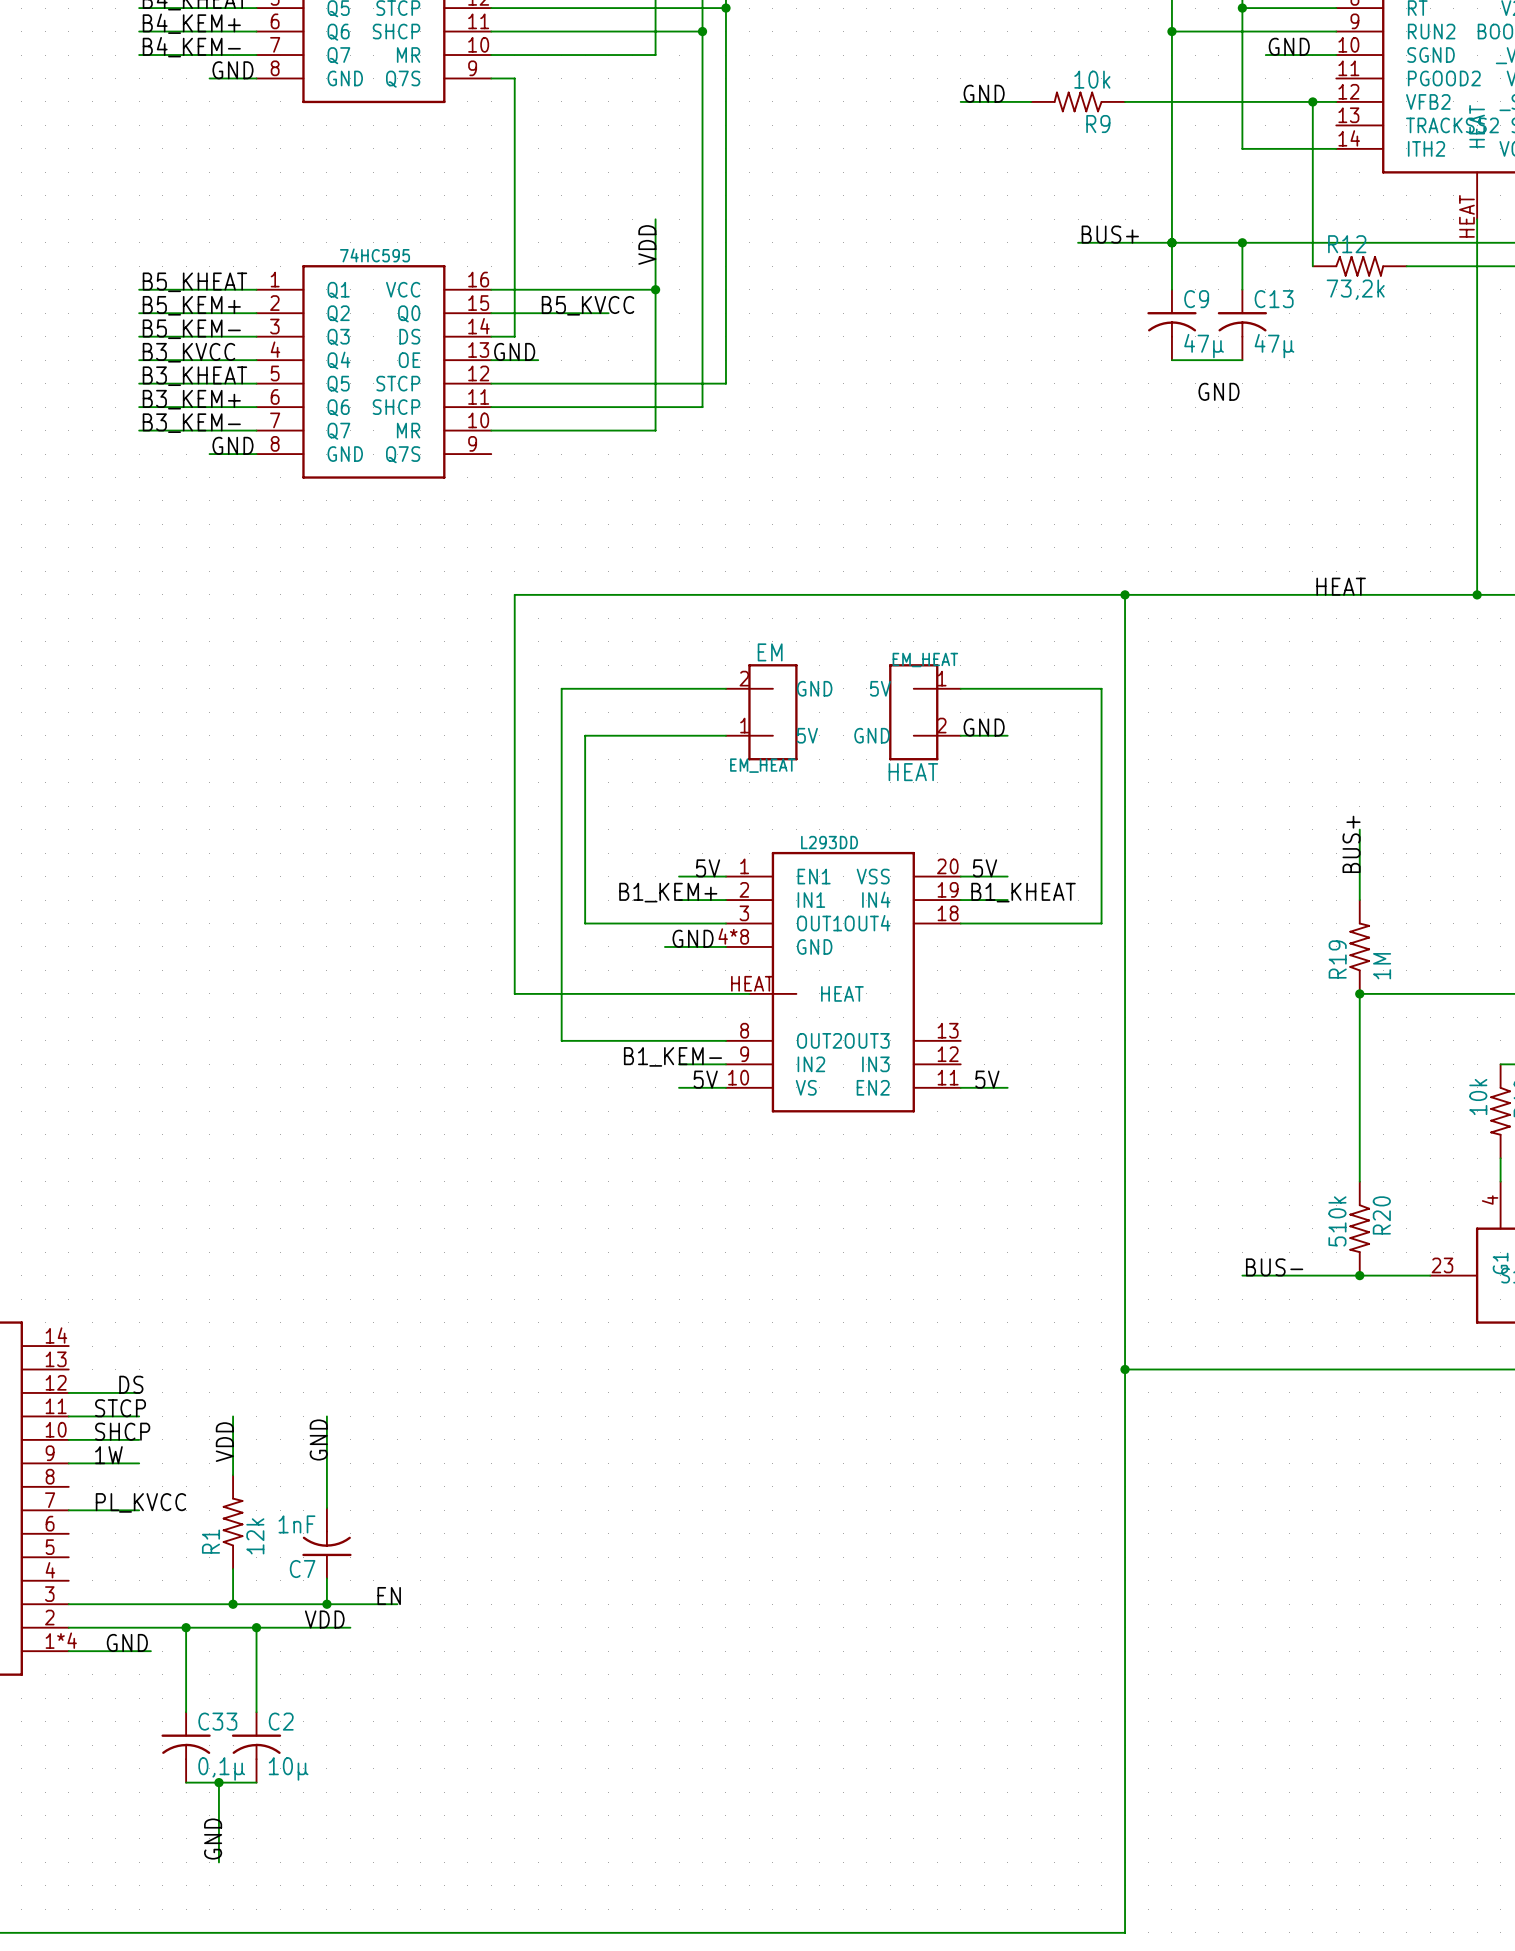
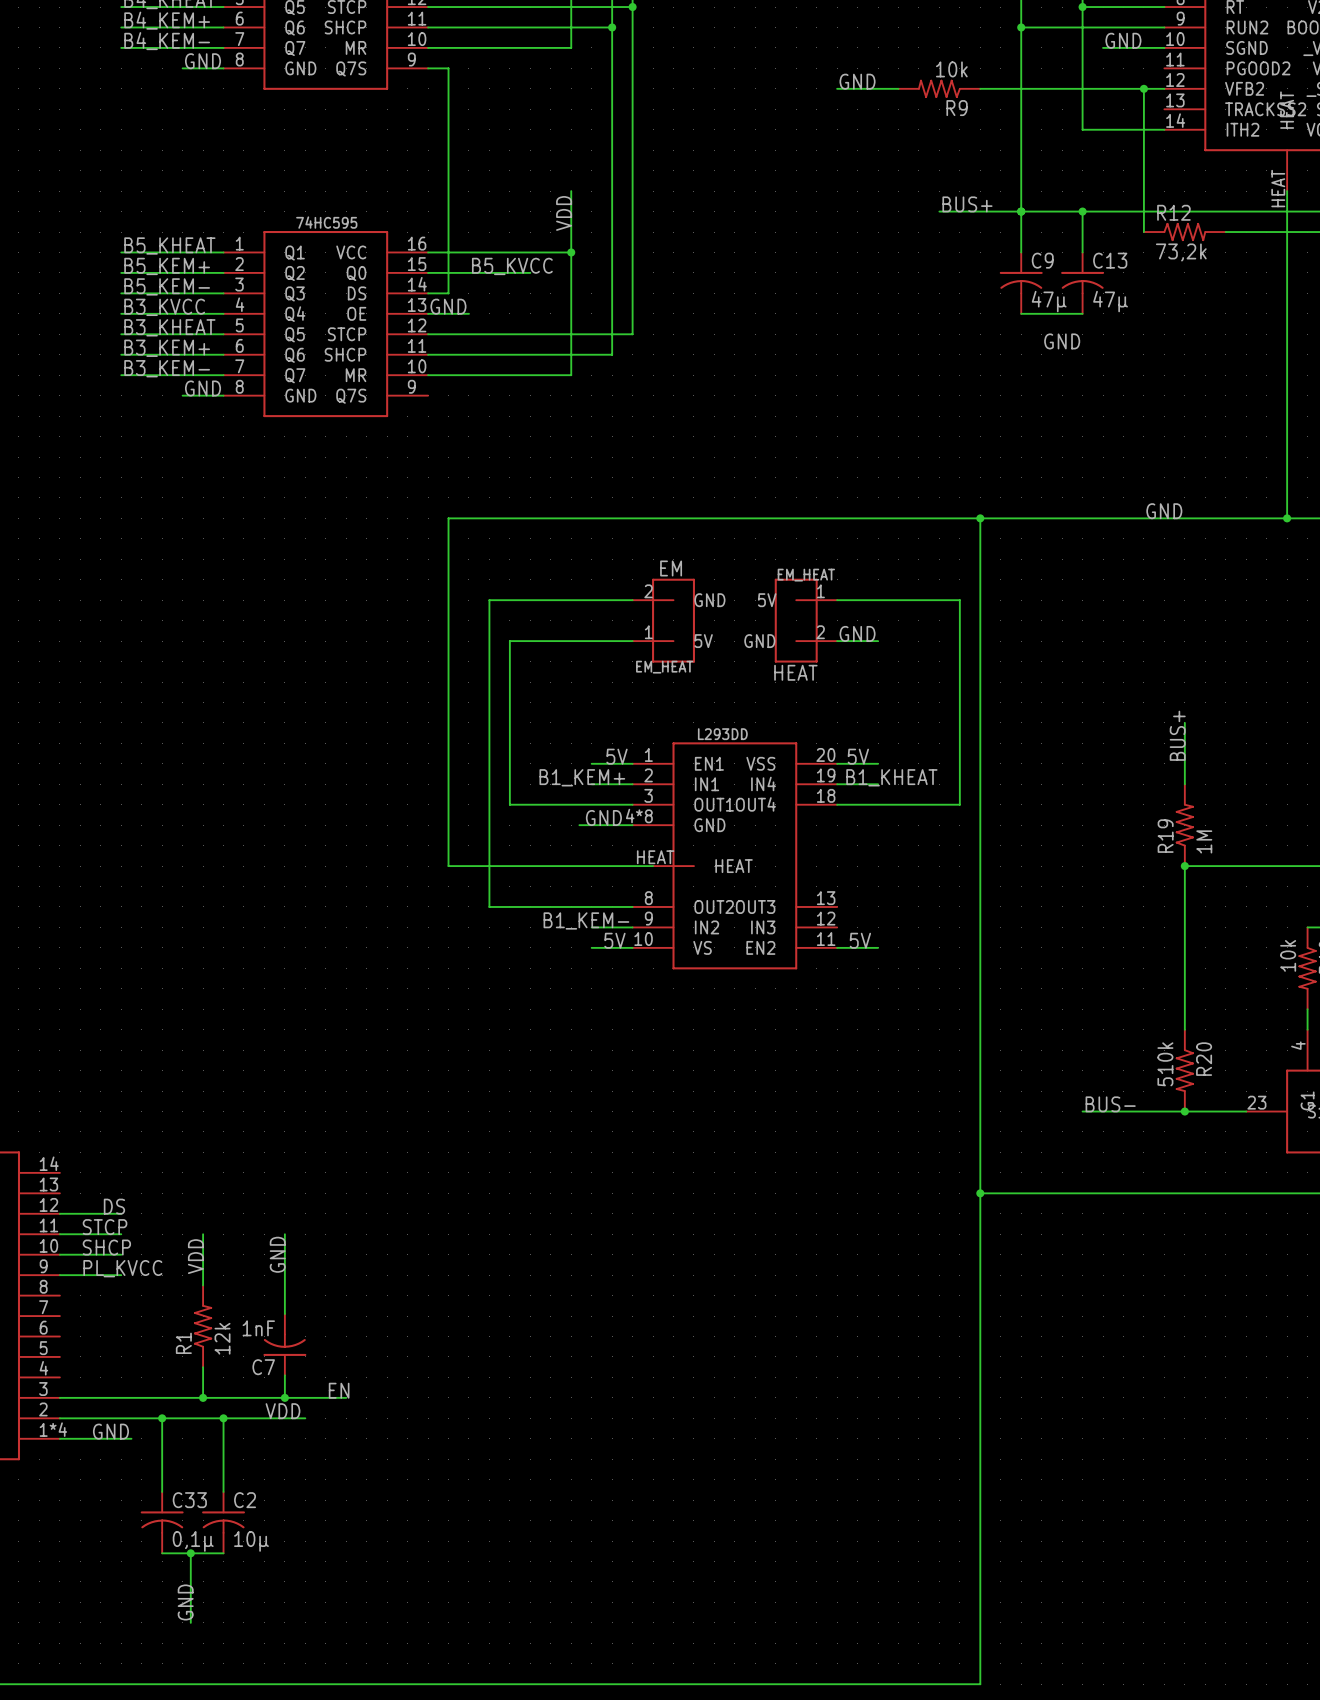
label: HEAT (1341, 586) -> GND (1164, 511)
label: 1W (108, 1455) -> PL_KVCC (122, 1268)
label: PL_KVCC (140, 1502) -> none
wire: (68, 1510) (139, 1510) -> none

